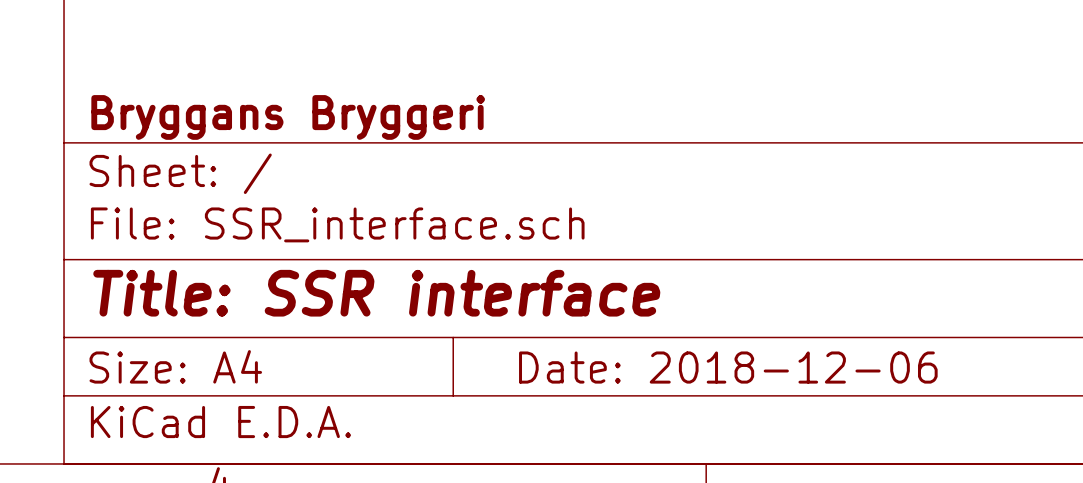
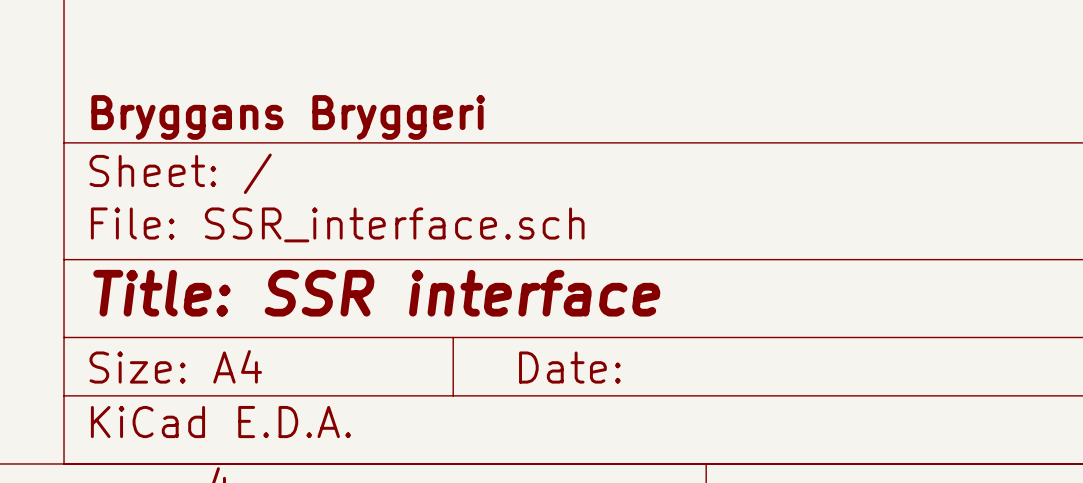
title block: Date: 2018-12-06 (728, 367) -> Date: (569, 367)

